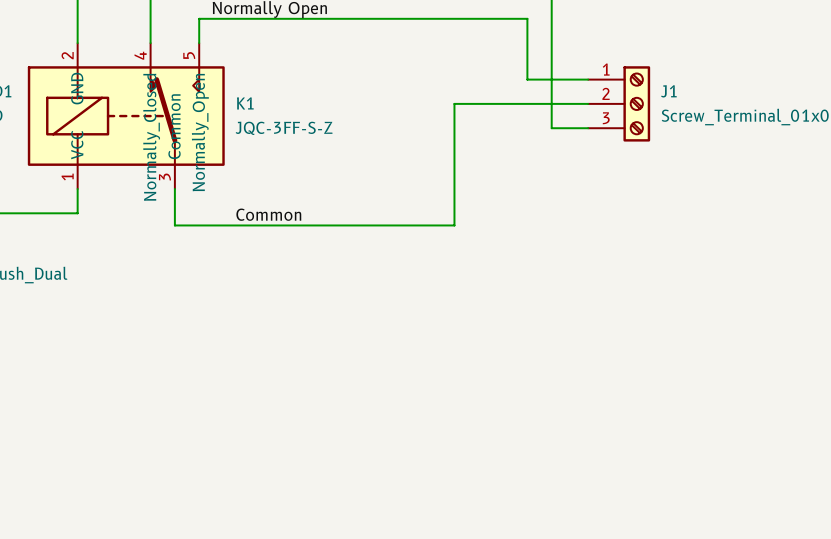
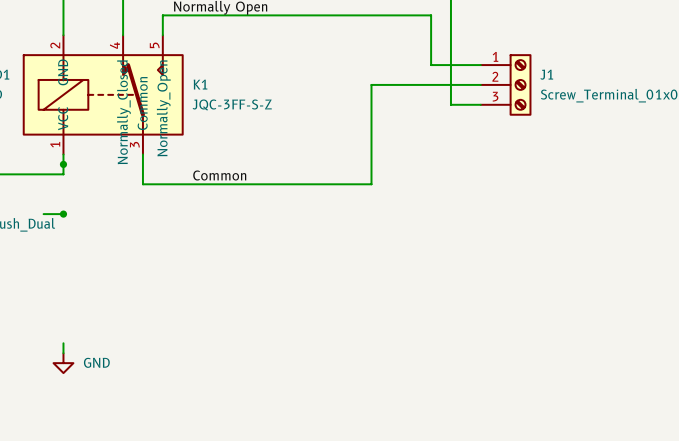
junction: none -> (63, 164)
wire: none -> (43, 214) (63, 214)
junction: none -> (63, 214)
wire: none -> (63, 343) (63, 353)
power symbol: none -> GND (63, 363)

